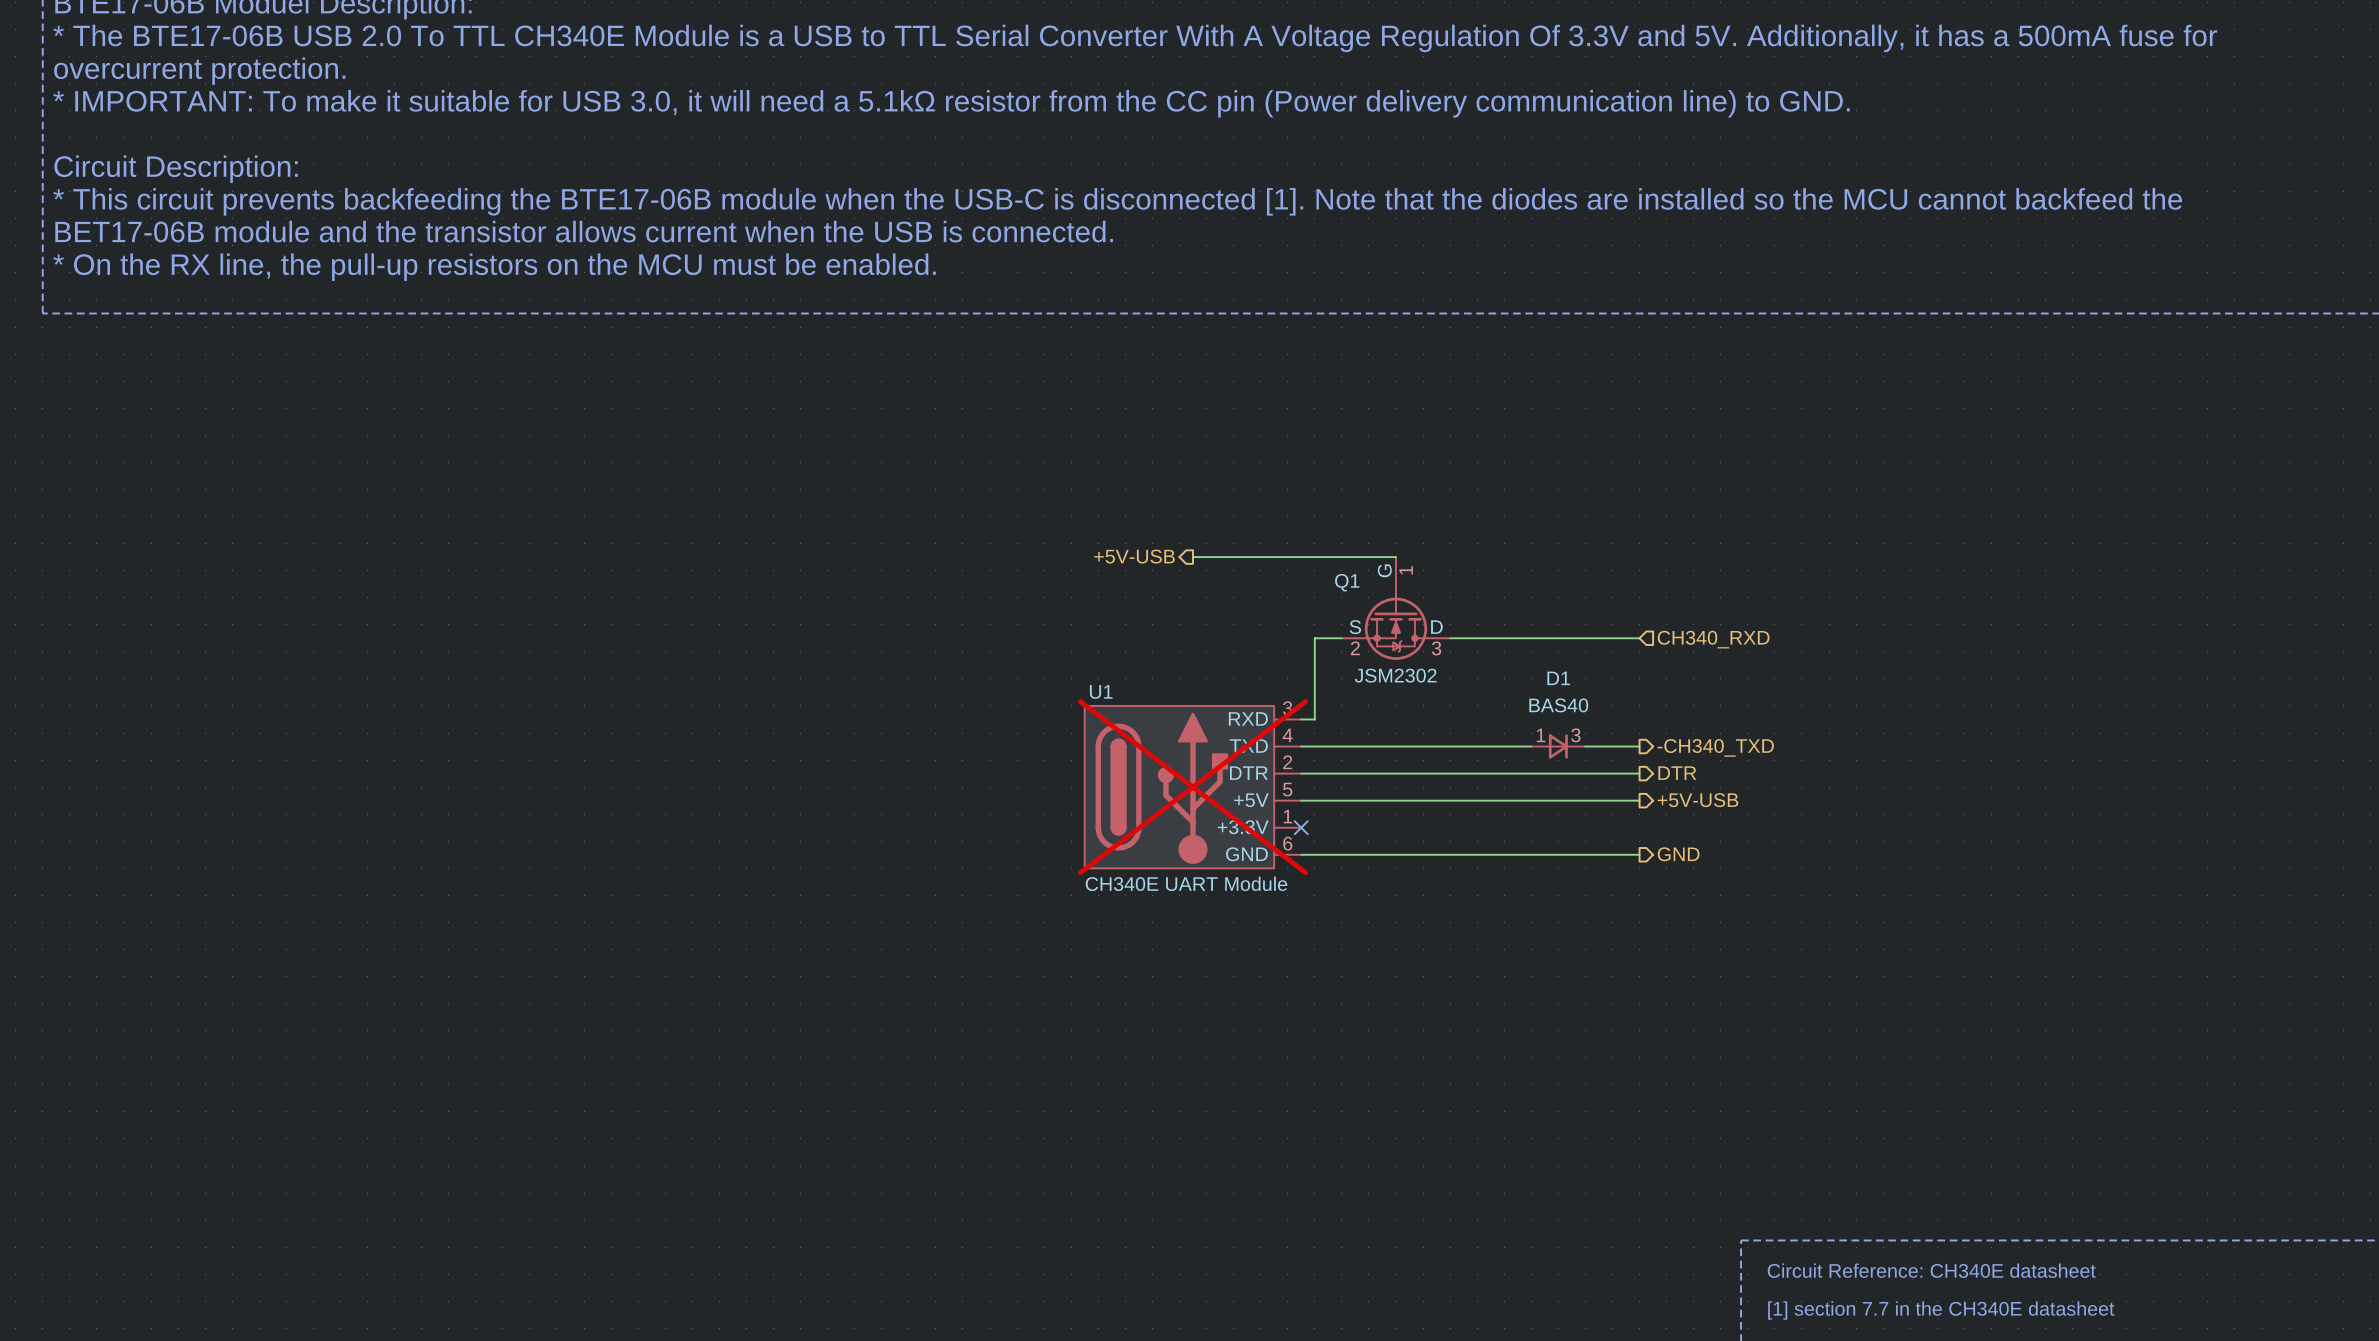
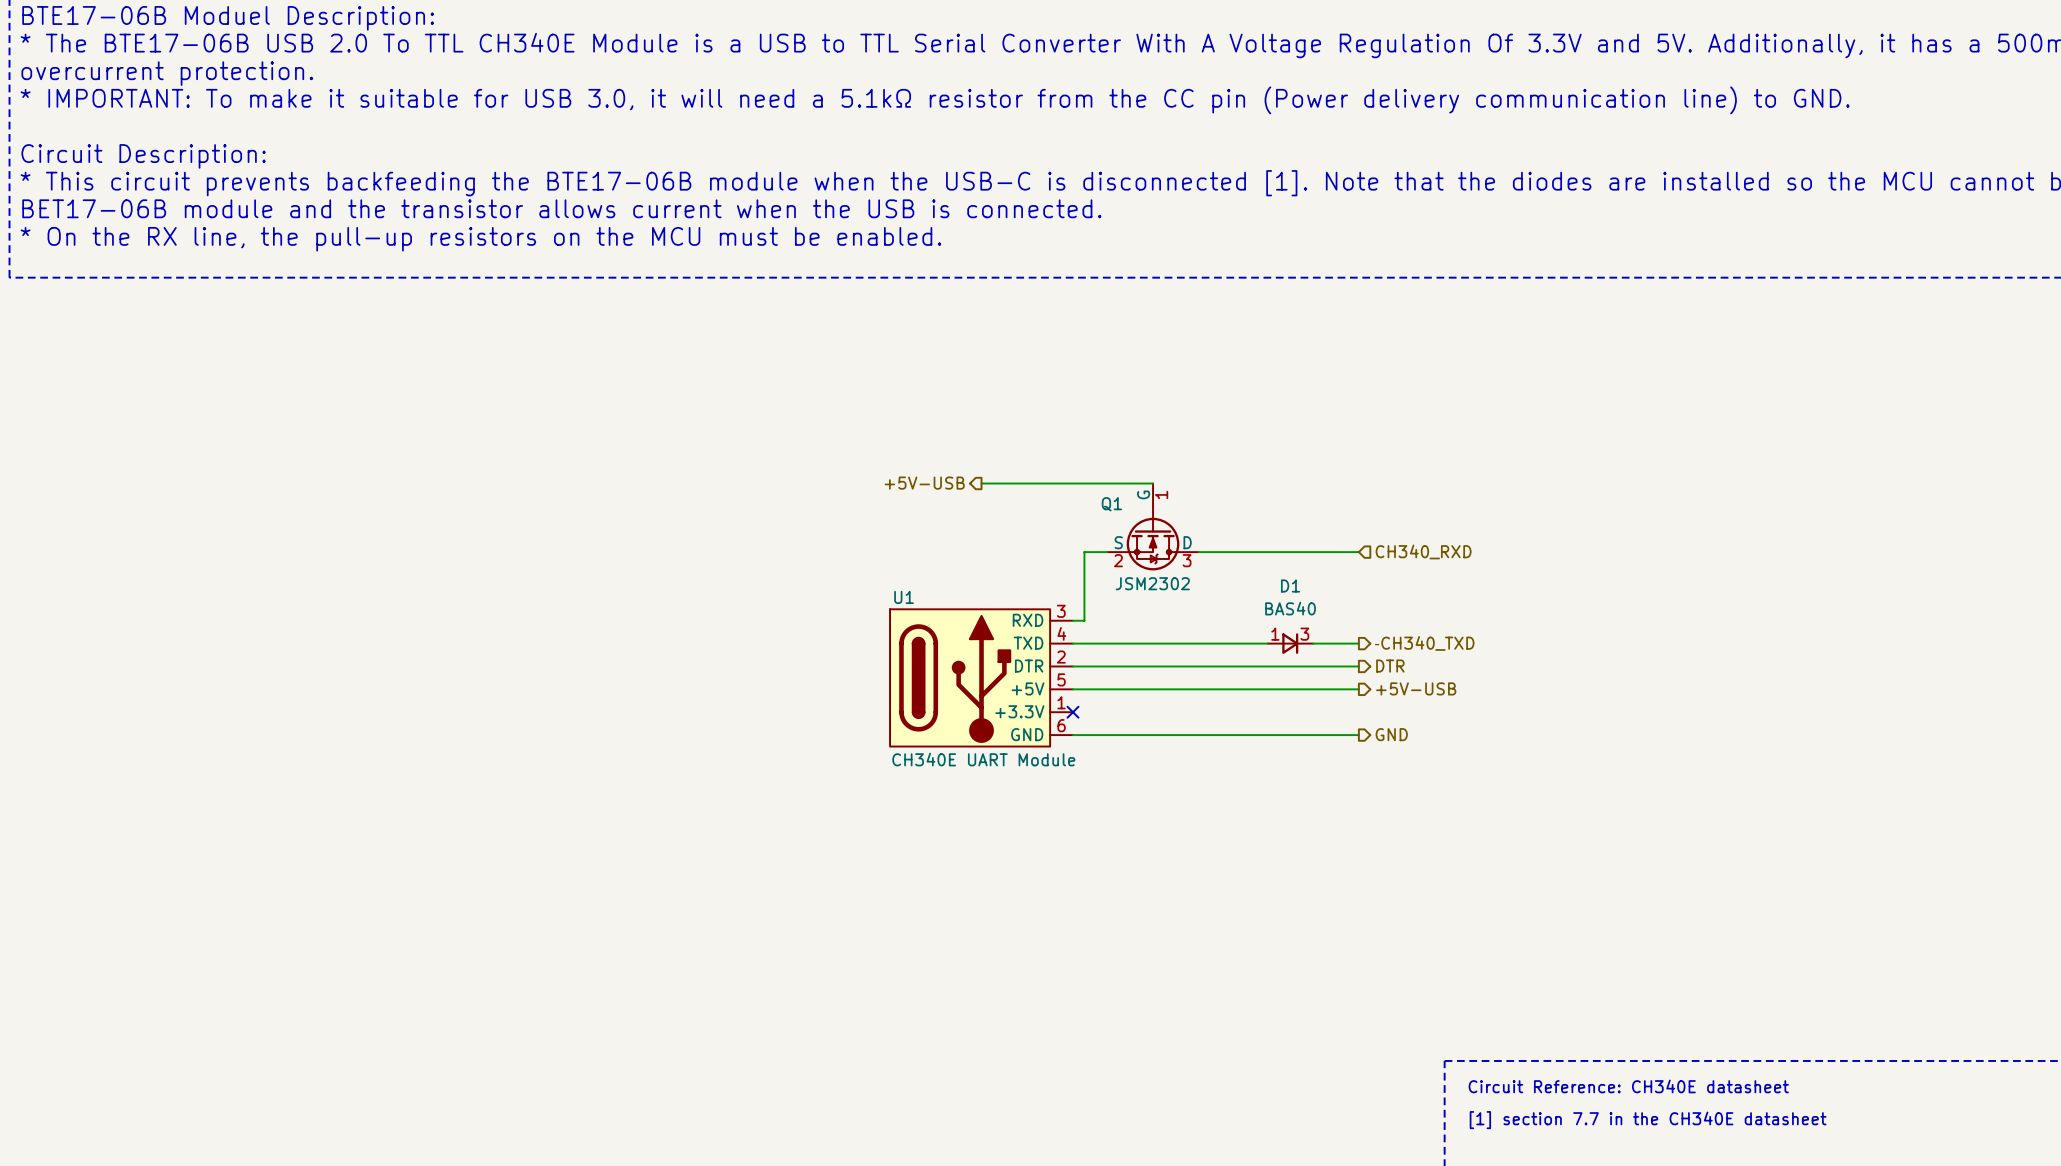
U1 do-not-place cross: (1192, 787) -> none

